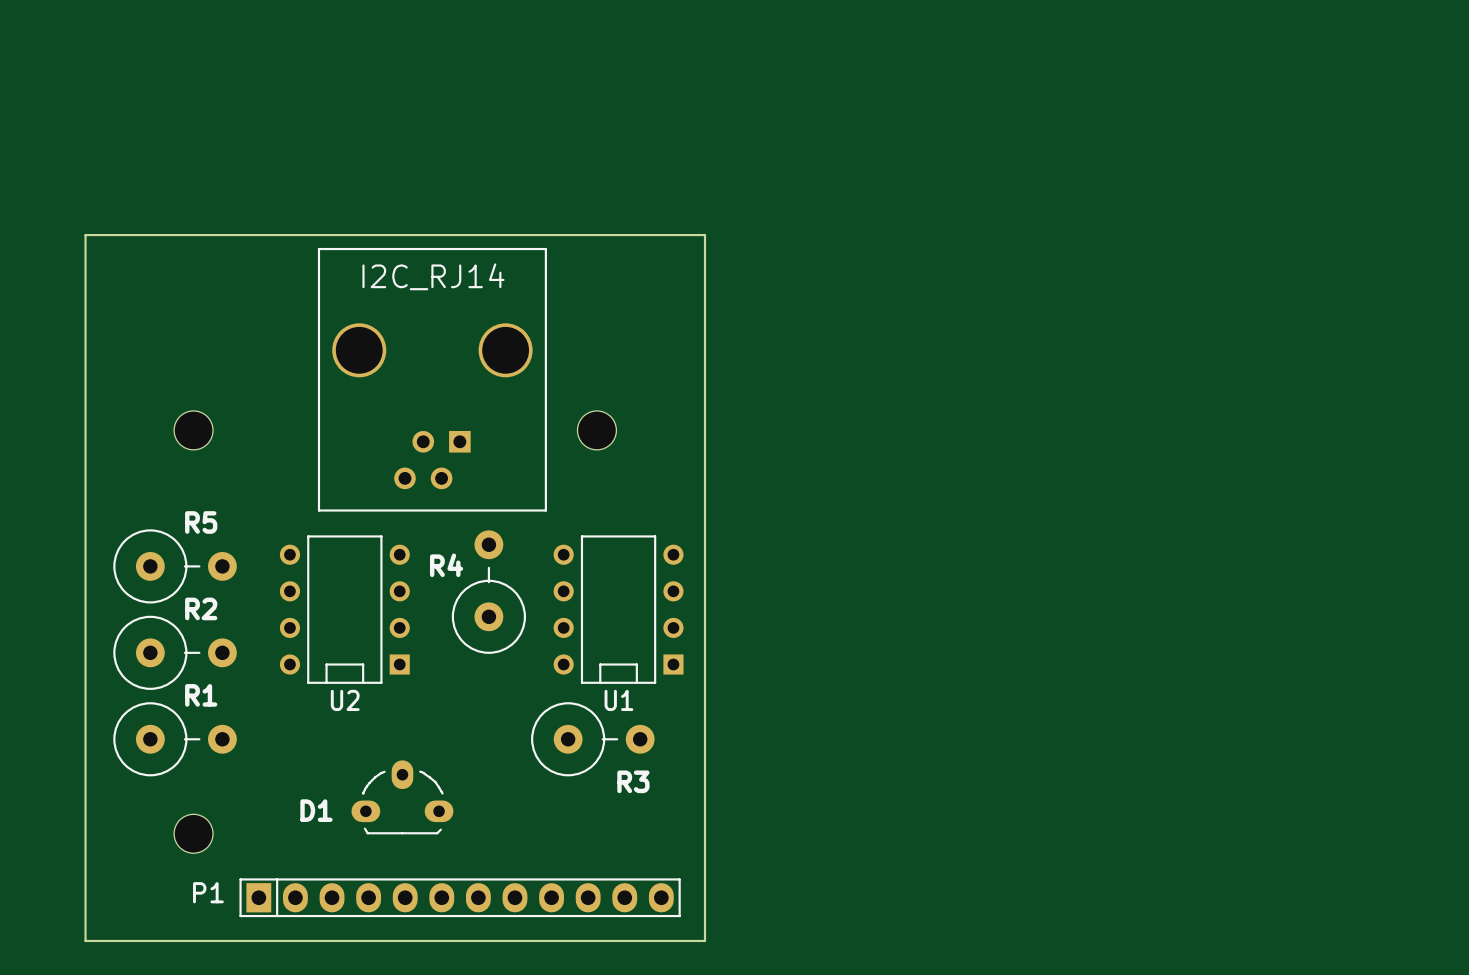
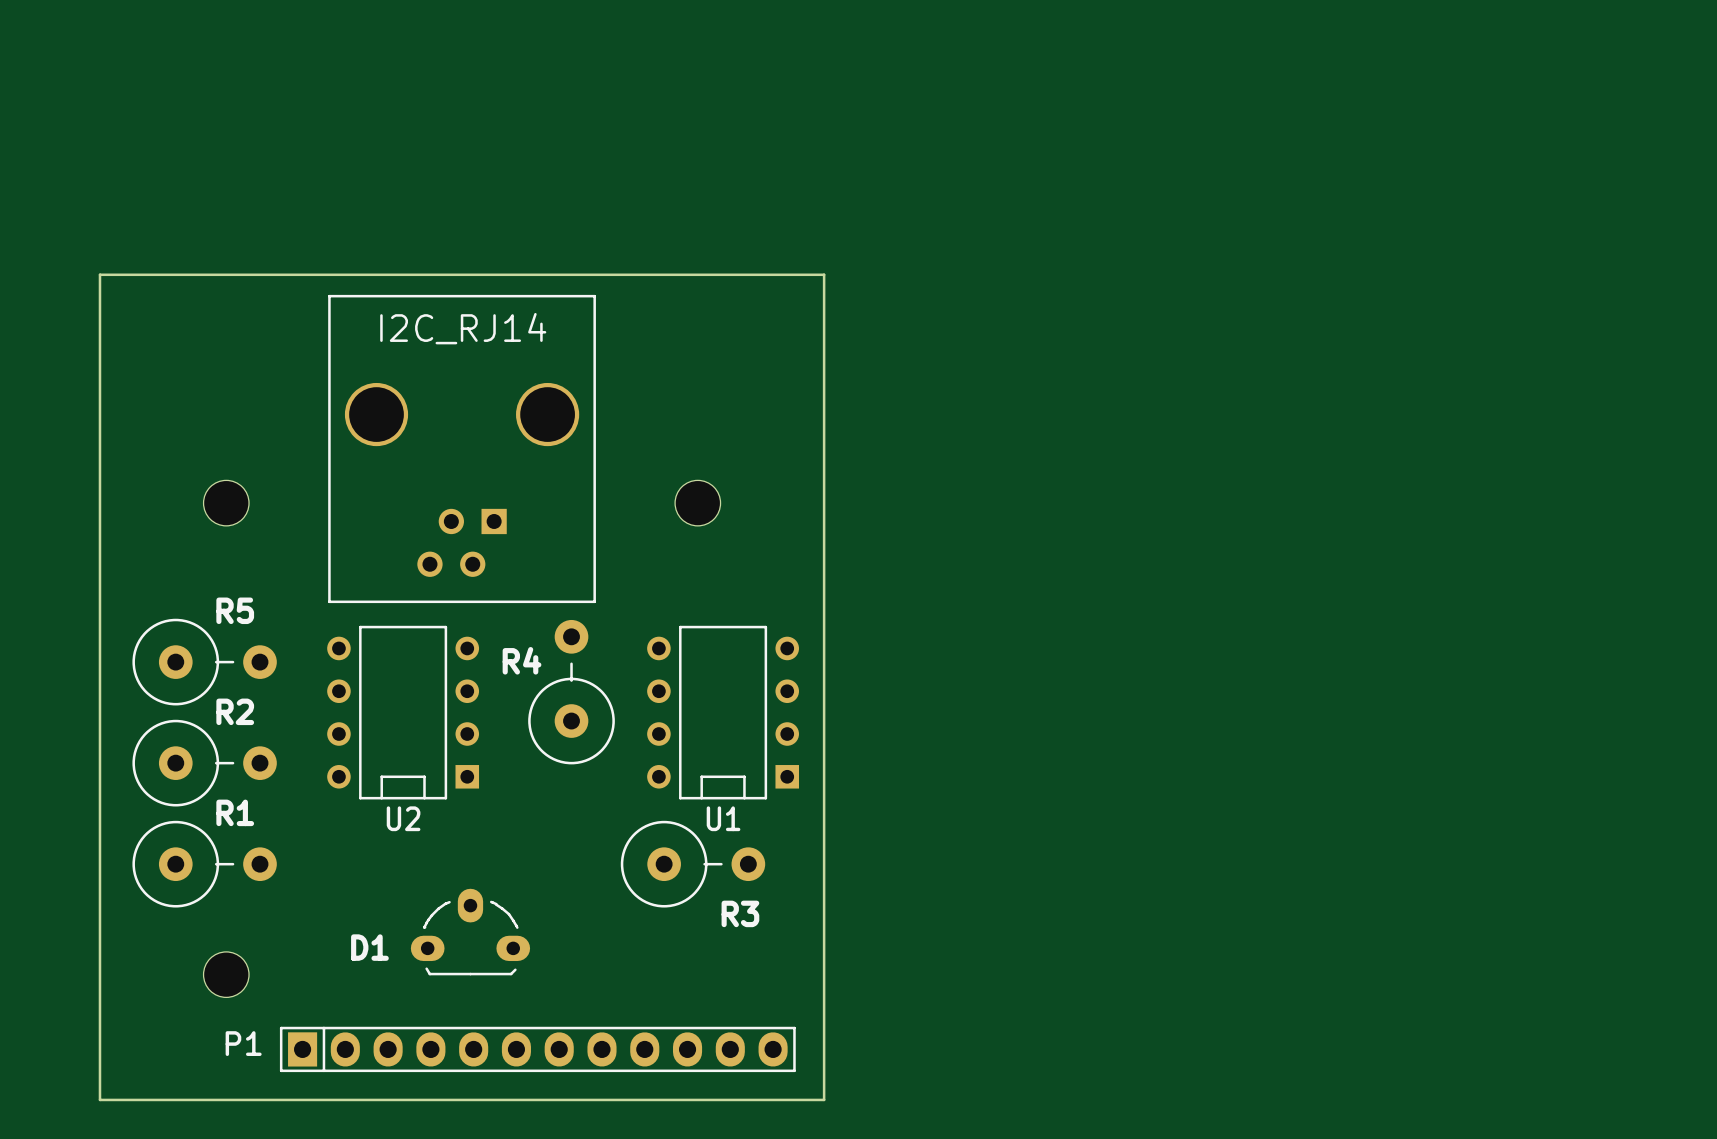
part position: (432, 379) -> (462, 448)

